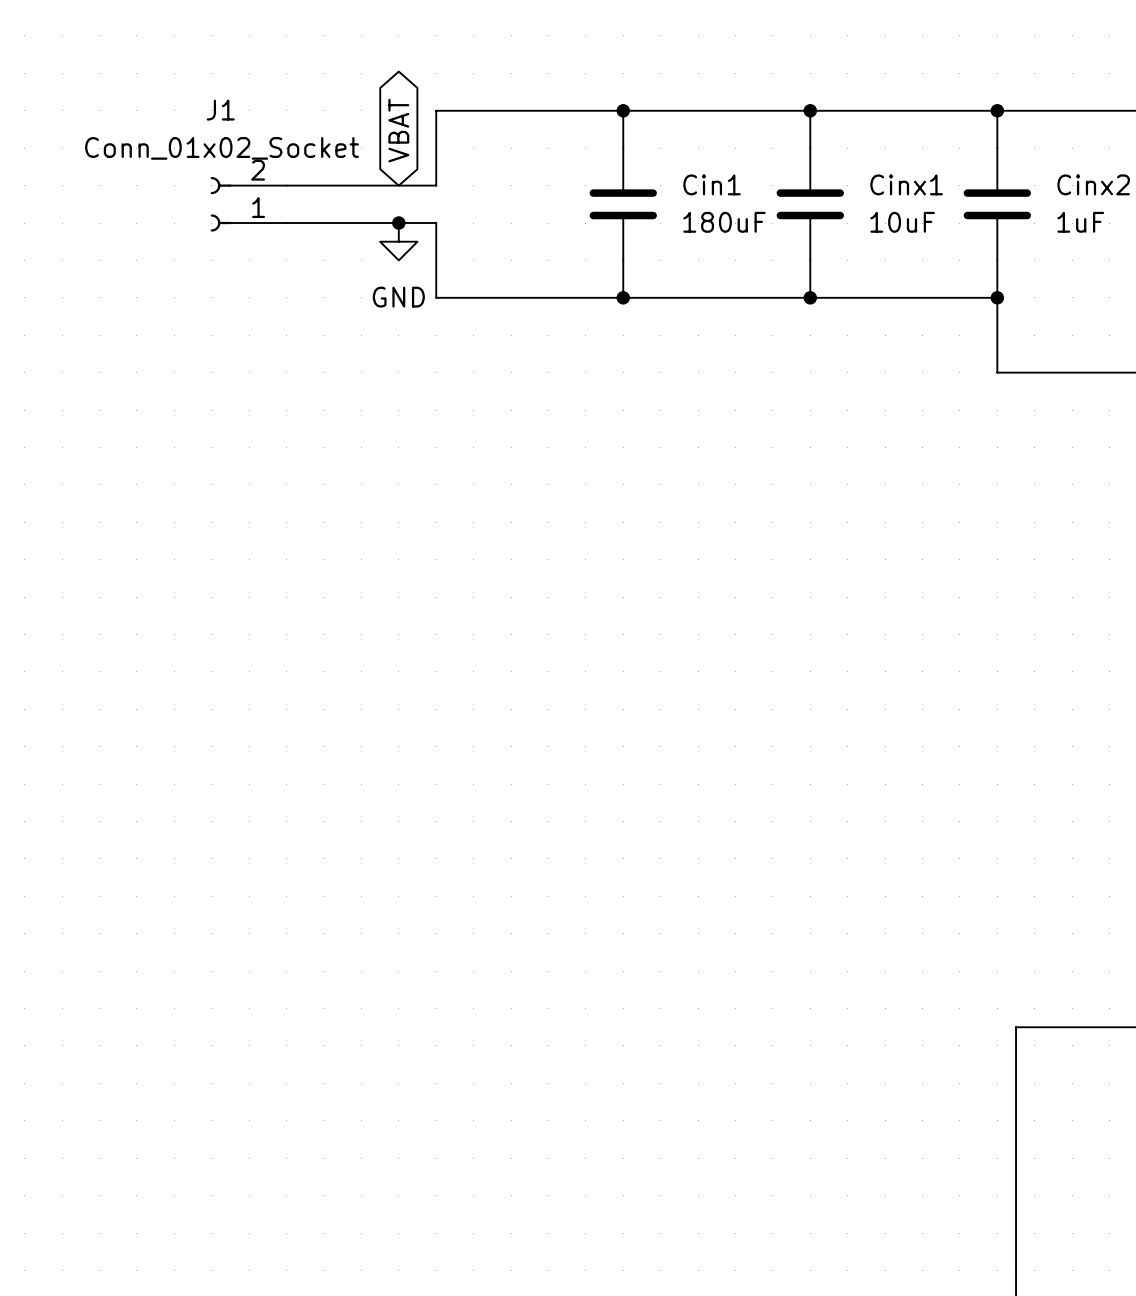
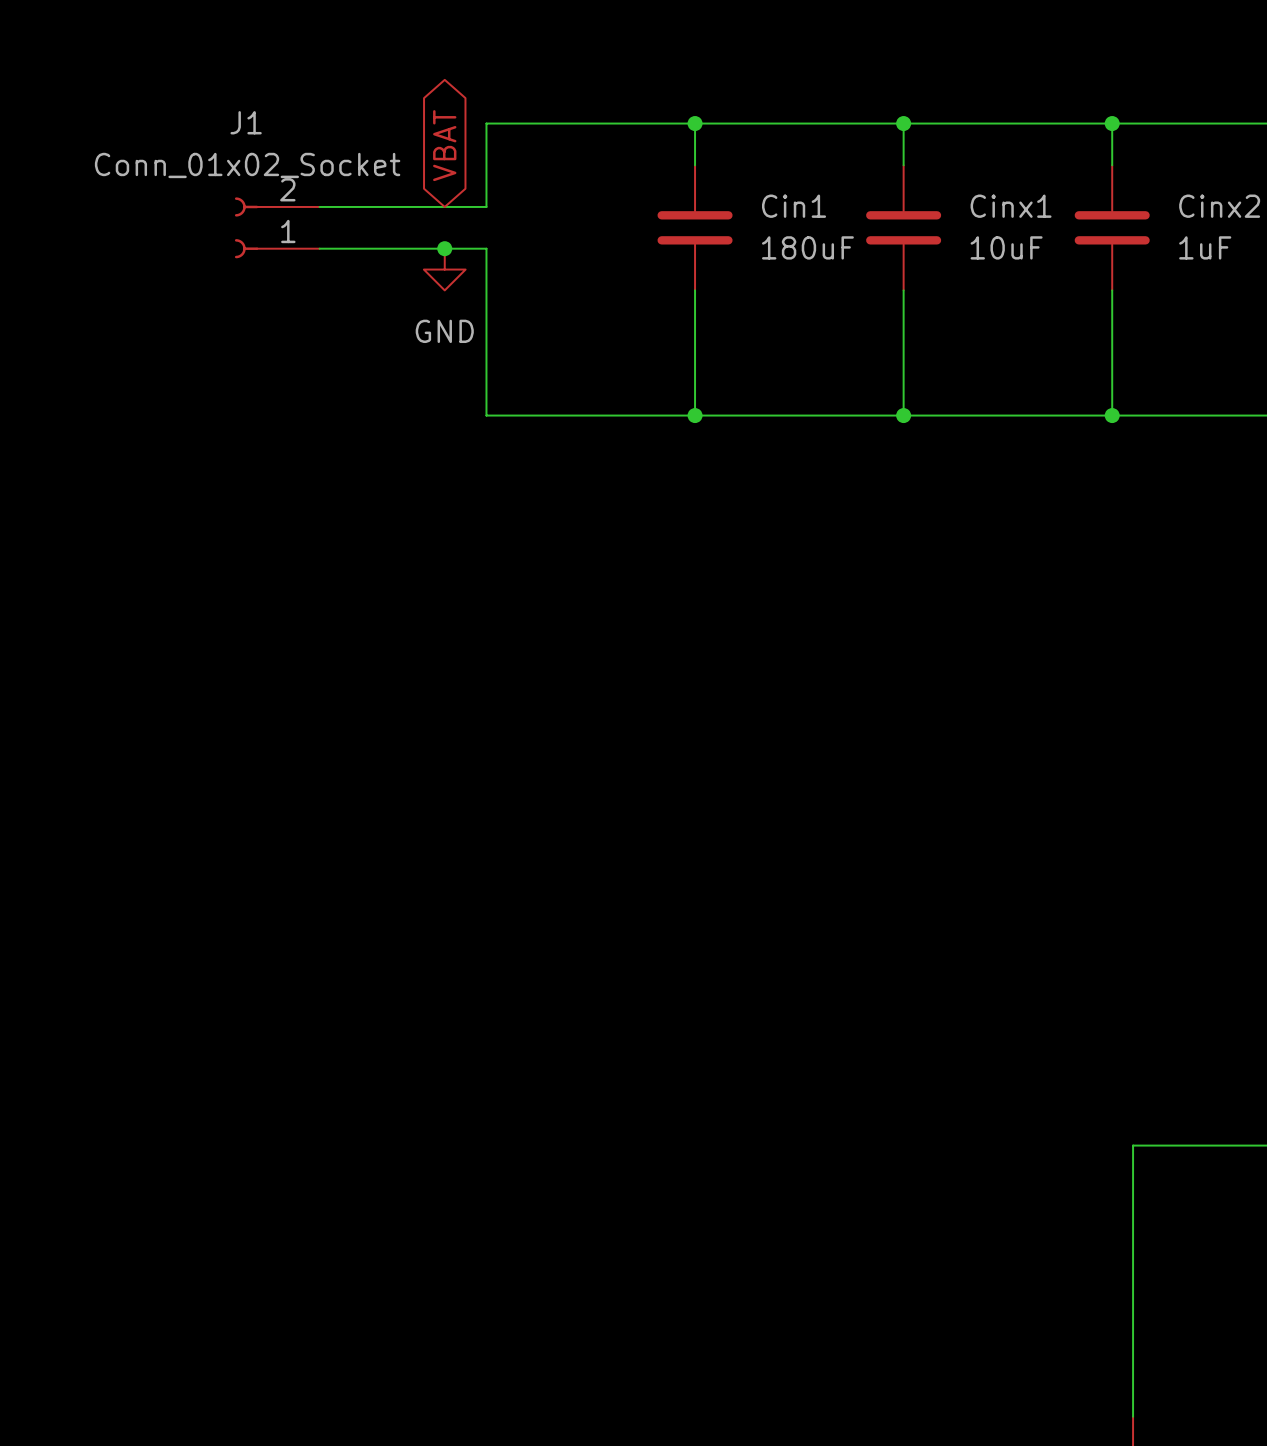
wire: (436, 297) (997, 297) -> (486, 332) (486, 415) (1112, 415)
wire: none -> (695, 332) (695, 415)
junction position: (623, 297) -> (695, 415)
wire: none -> (903, 332) (903, 415)
junction position: (810, 297) -> (903, 415)
junction position: (997, 297) -> (1112, 415)

